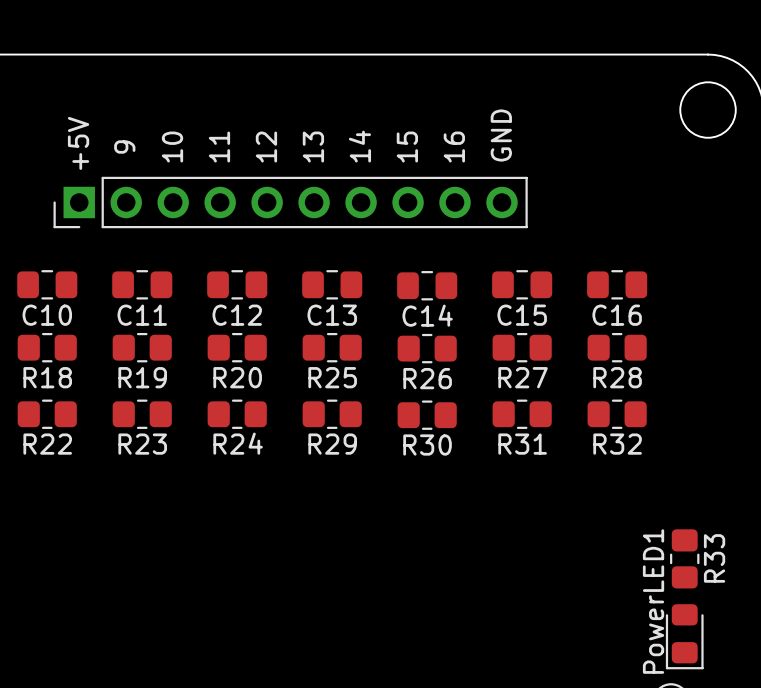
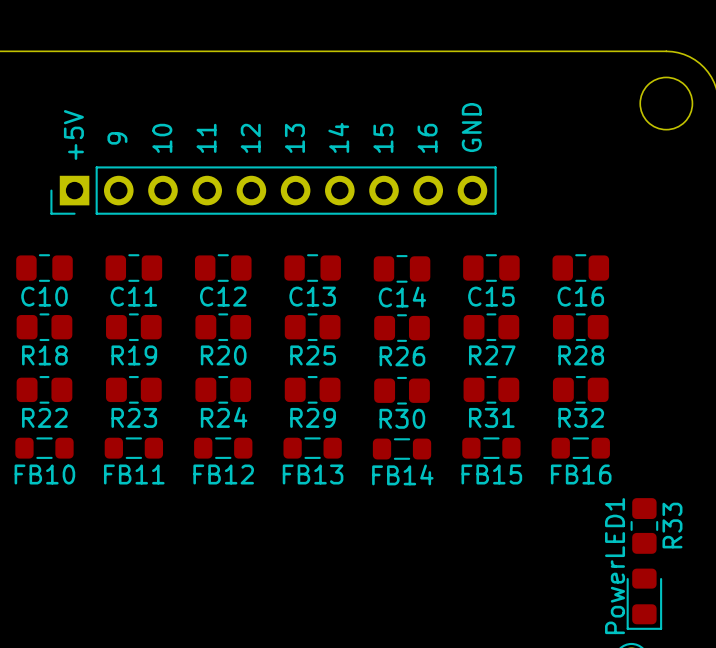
FB10: none -> (44, 448)
FB11: none -> (133, 448)
FB12: none -> (223, 448)
FB13: none -> (312, 448)
FB15: none -> (491, 448)
FB16: none -> (580, 448)
FB14: none -> (402, 449)

